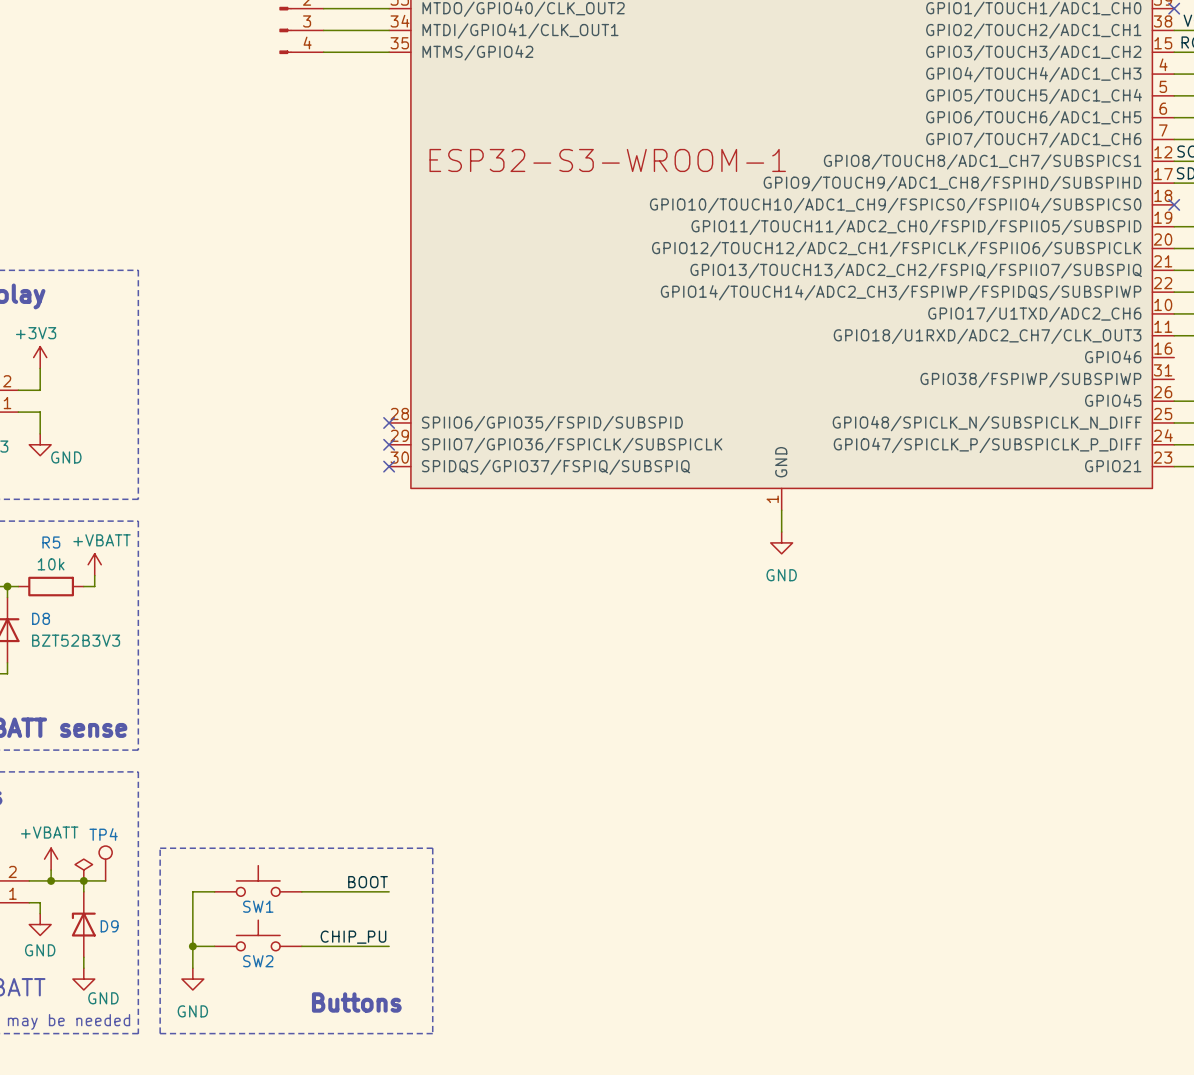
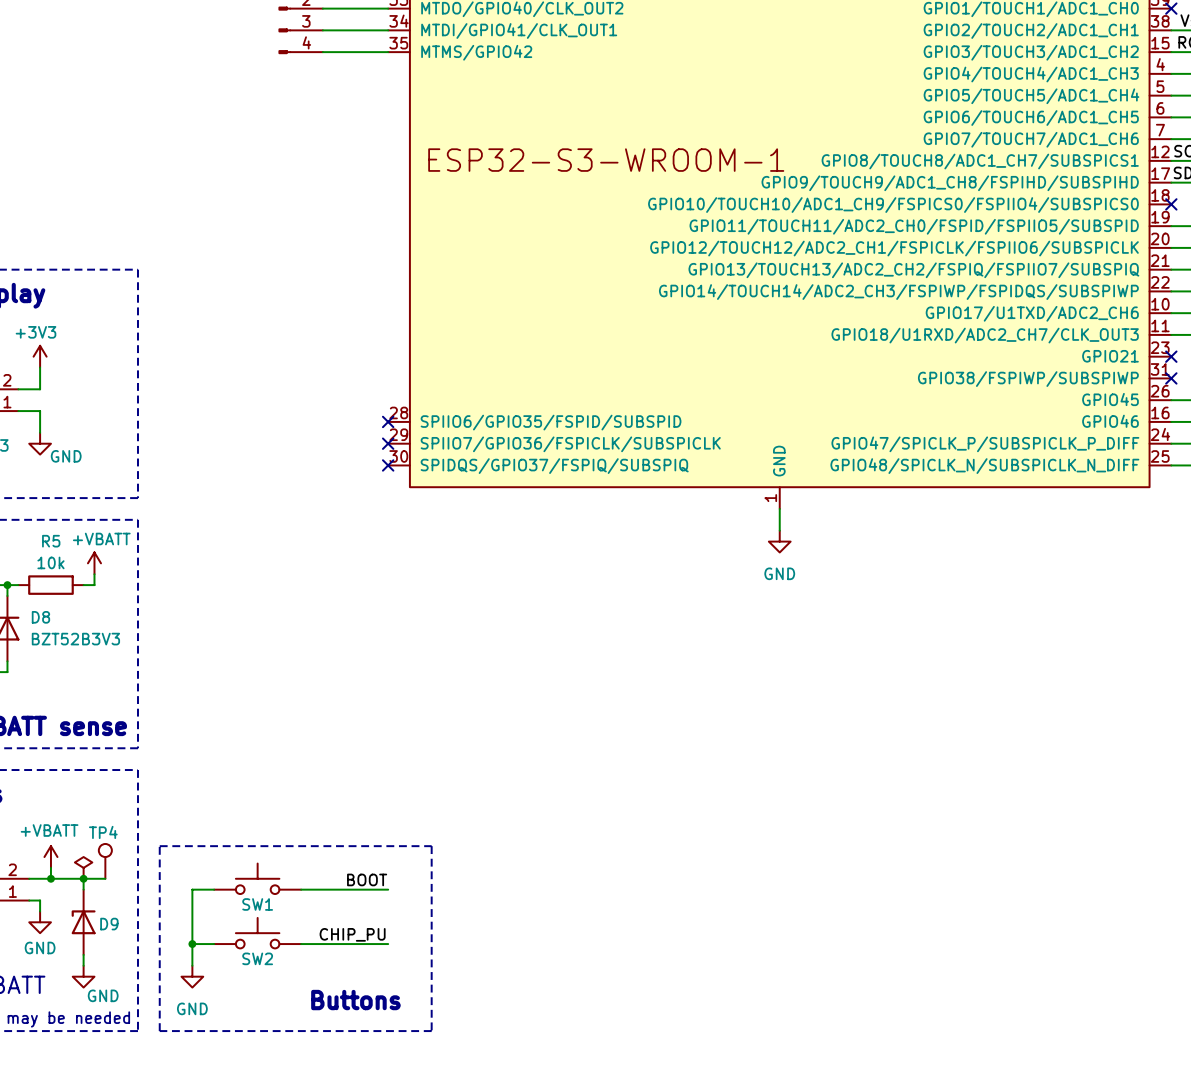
part pin number: 16 (1163, 348) -> 23 (1160, 347)
part pin name: GPIO46 (1113, 356) -> GPIO21 (1110, 356)
no-connect mark: none -> (1171, 356)
no-connect mark: none -> (1171, 378)
part pin number: 25 (1163, 413) -> 16 (1160, 412)
part pin name: GPIO48/SPICLK_N/SUBSPICLK_N_DIFF (987, 423) -> GPIO46 (1110, 421)
part pin number: 23 (1163, 457) -> 25 (1160, 456)
part pin name: GPIO21 (1113, 466) -> GPIO48/SPICLK_N/SUBSPICLK_N_DIFF (984, 466)

